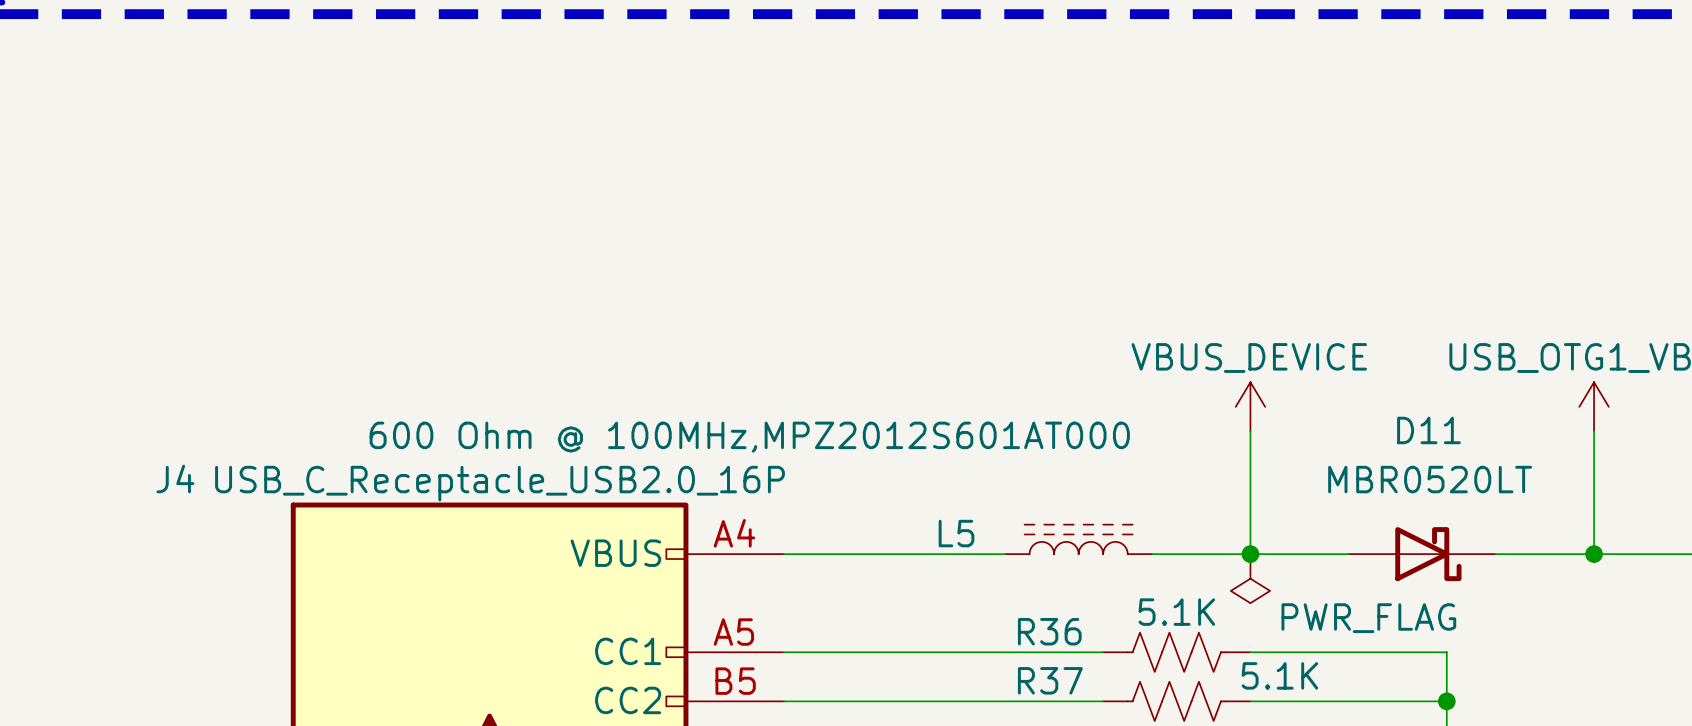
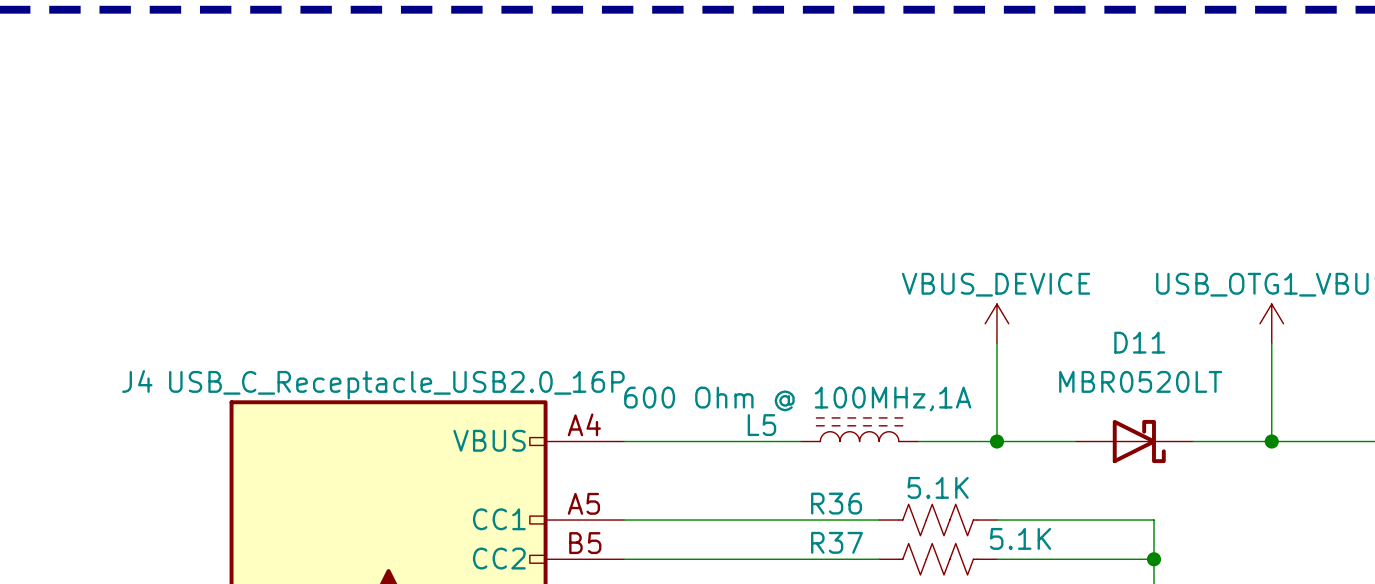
L5 value: 600 Ohm @ 100MHz,MPZ2012S601AT000 (749, 437) -> 600 Ohm @ 100MHz,1A (797, 399)
power symbol: PWR_FLAG (1250, 578) -> none

